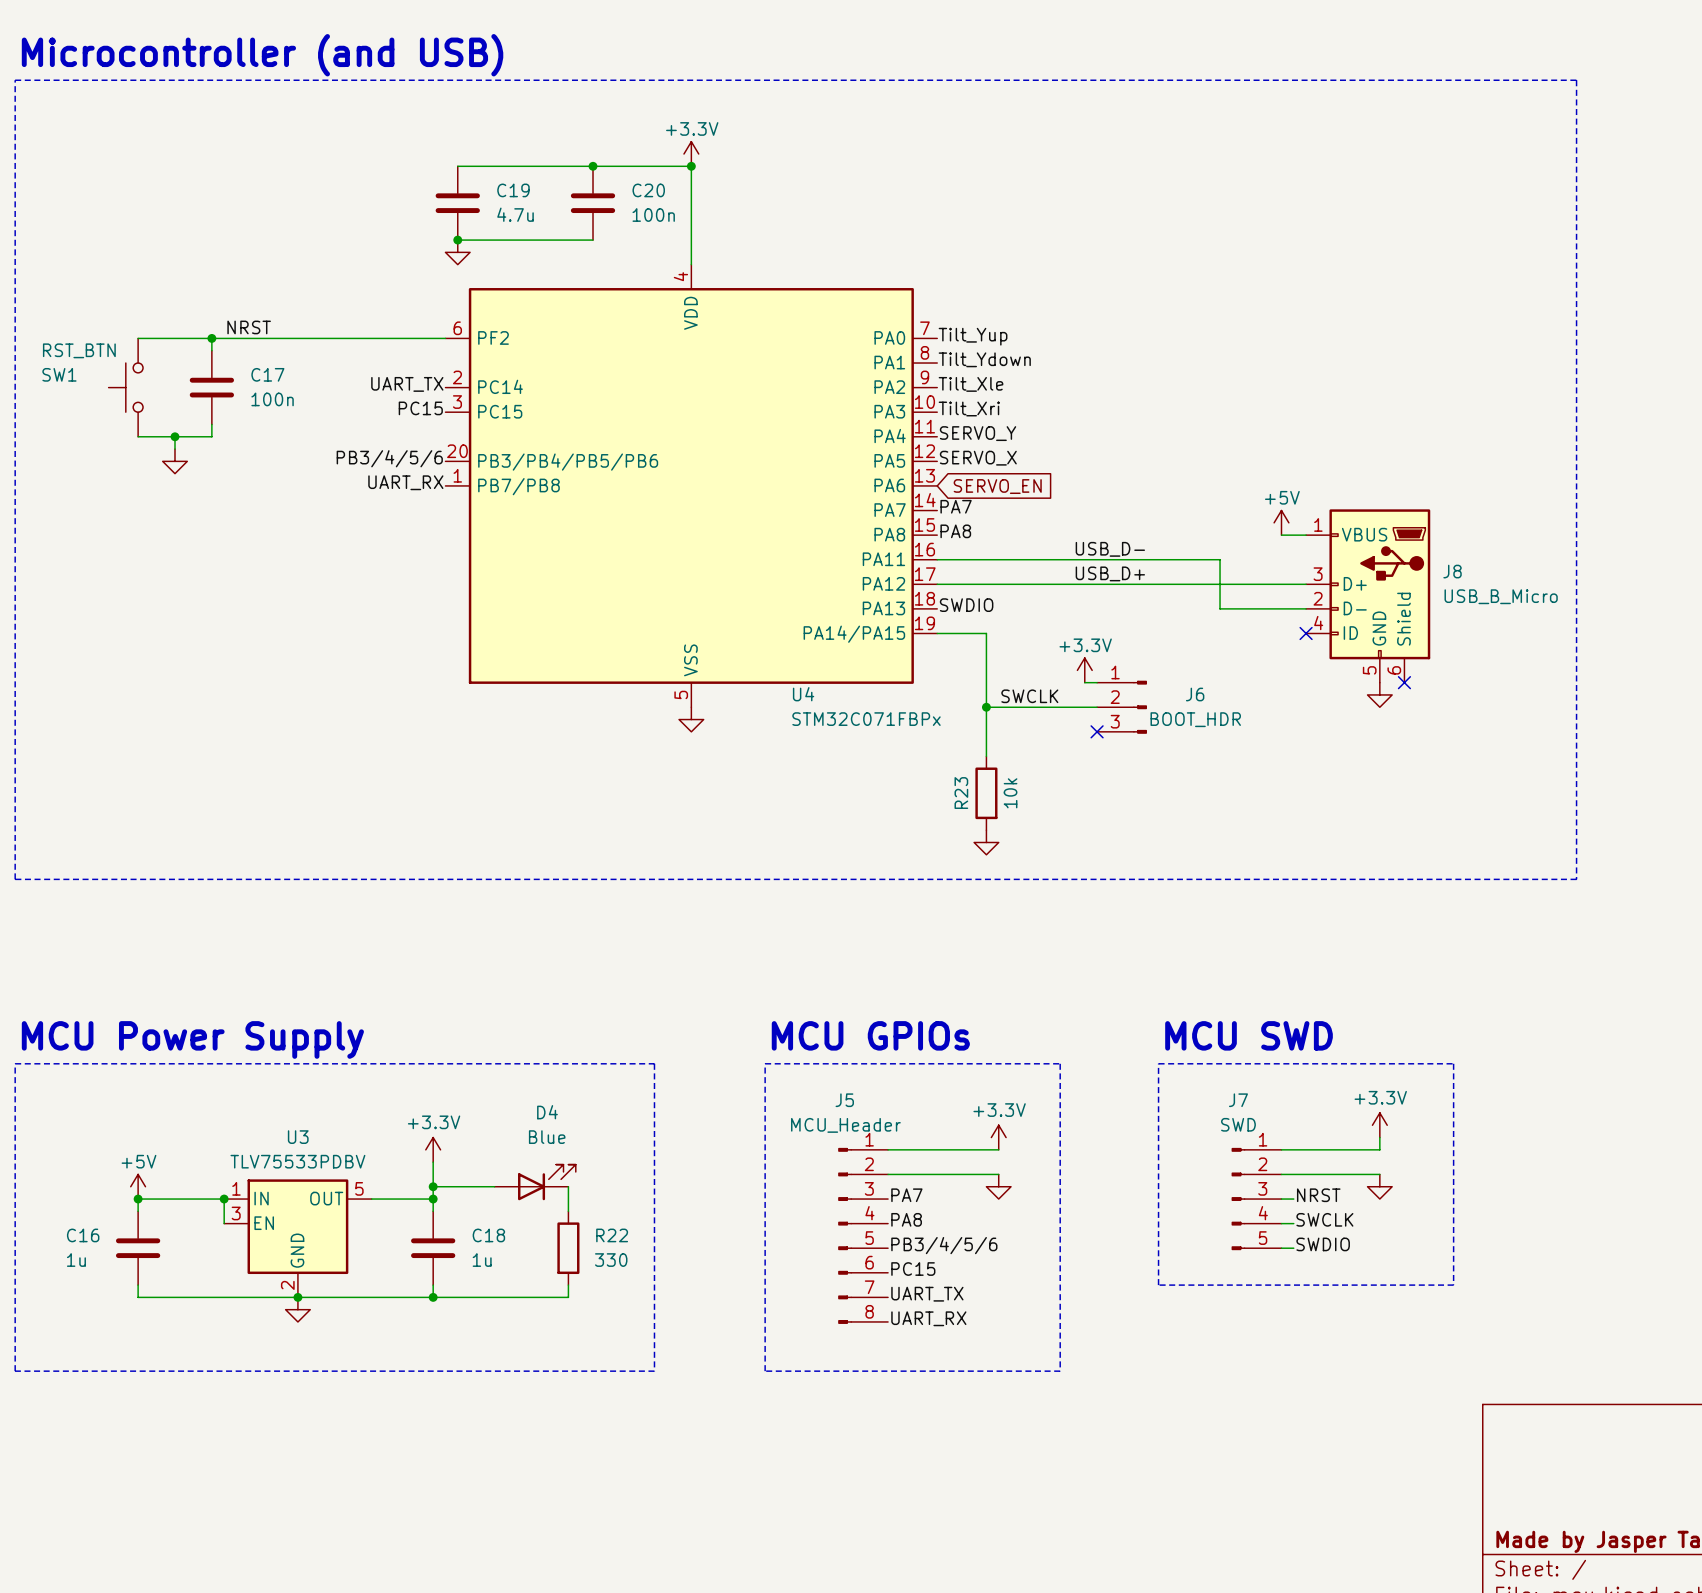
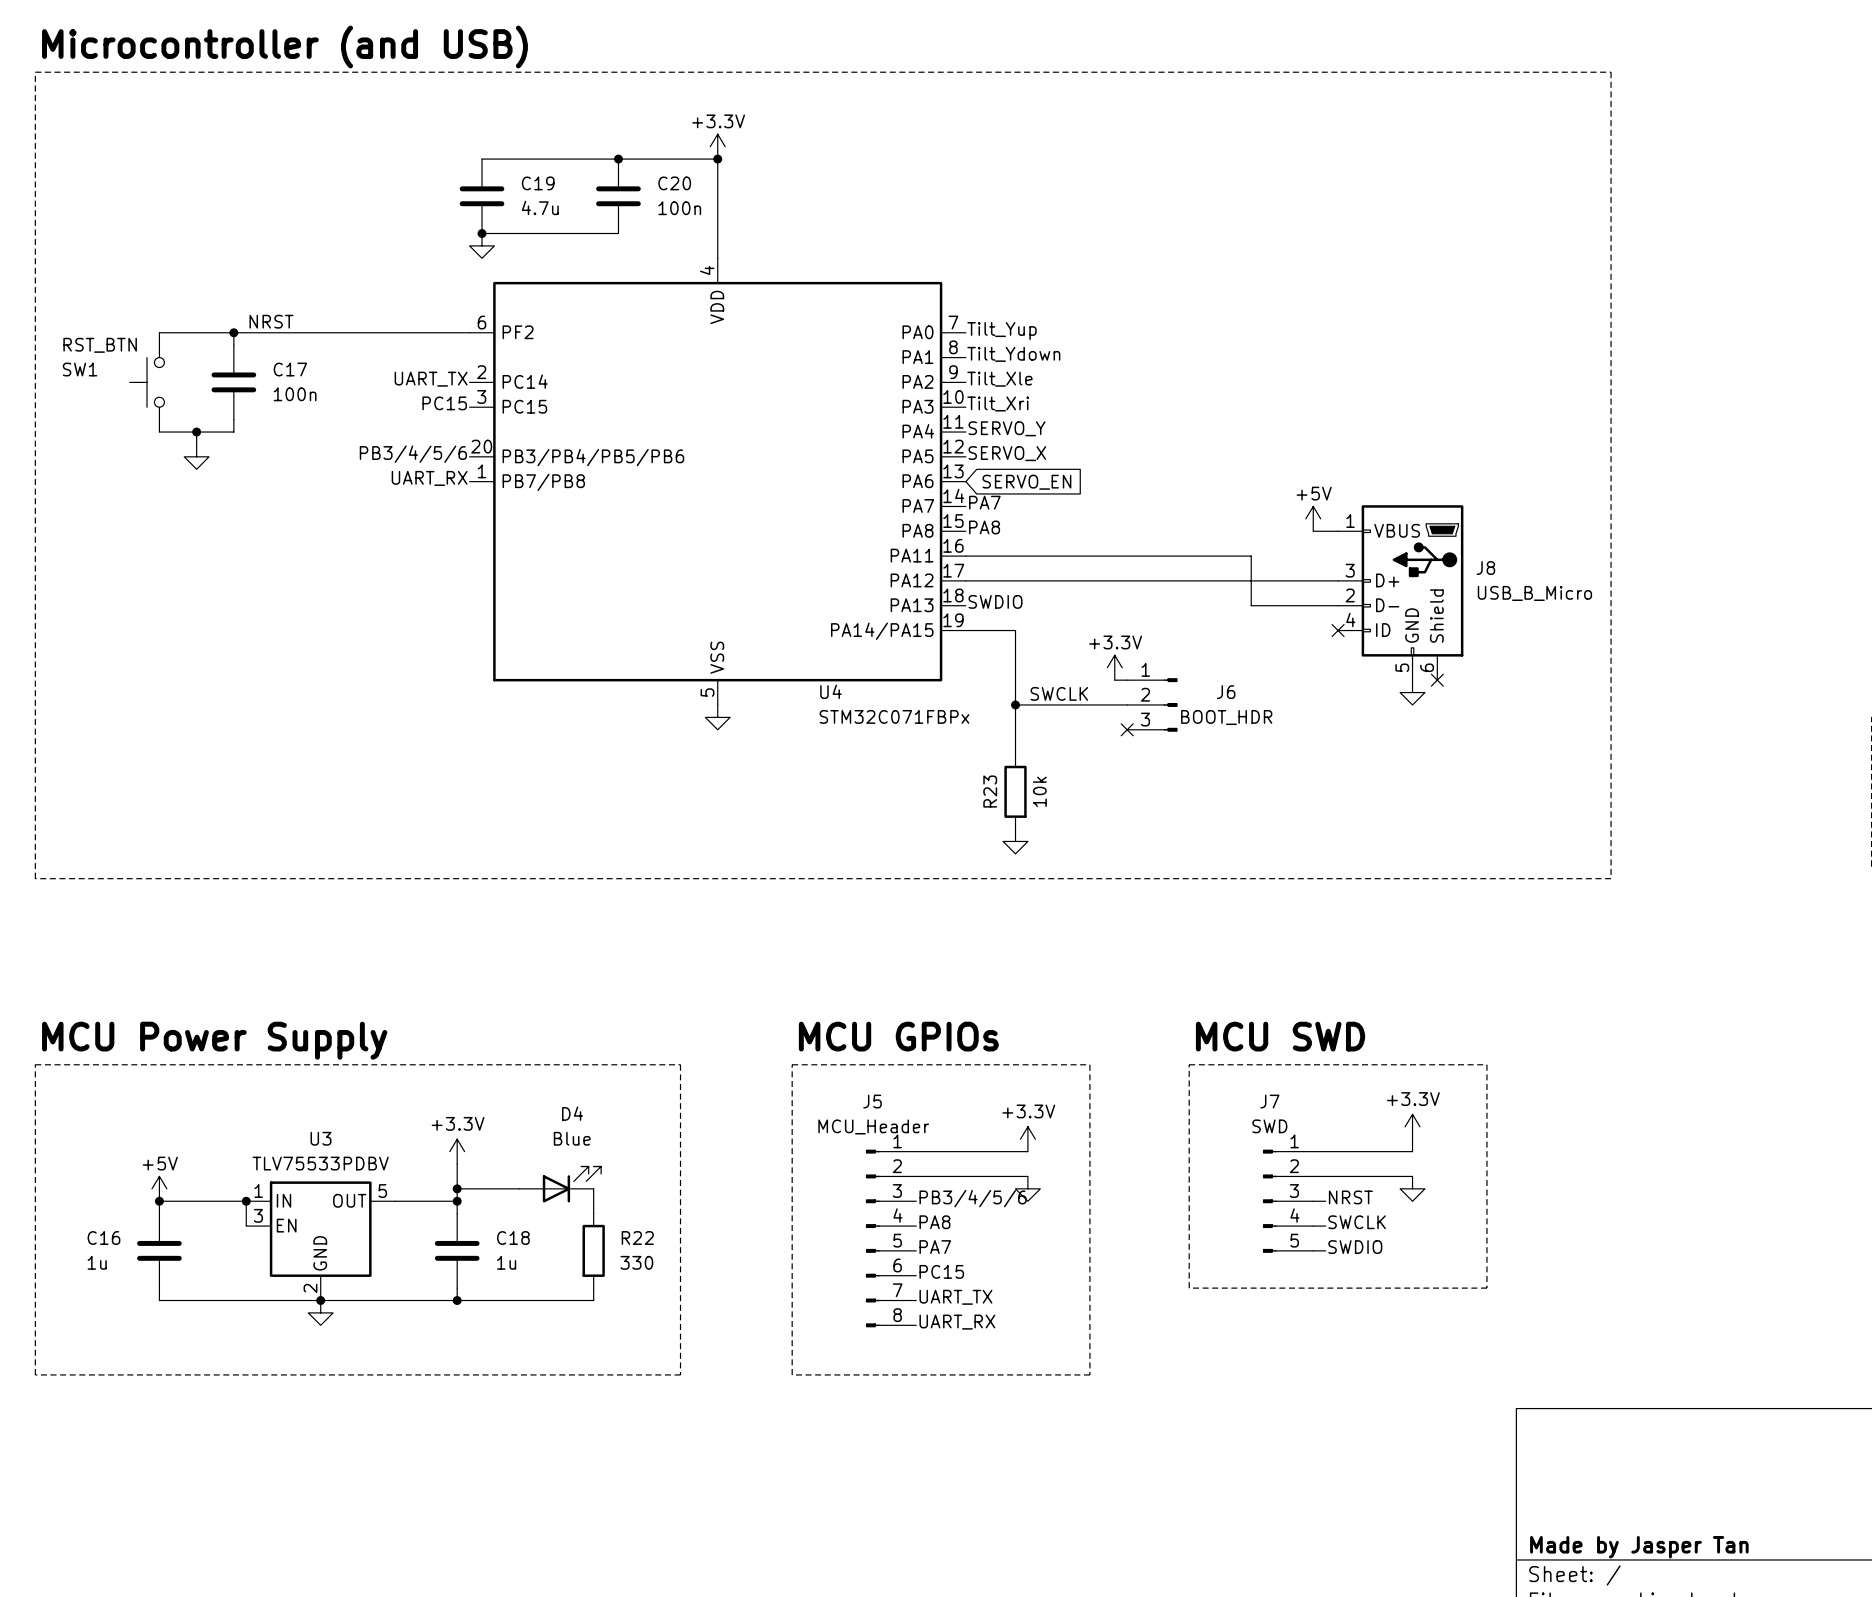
label: USB_D- (1110, 549) -> none
label: USB_D+ (1110, 573) -> none
label: PA7 (906, 1195) -> PB3/4/5/6 (973, 1198)
label: PB3/4/5/6 (944, 1245) -> PA7 (935, 1247)

